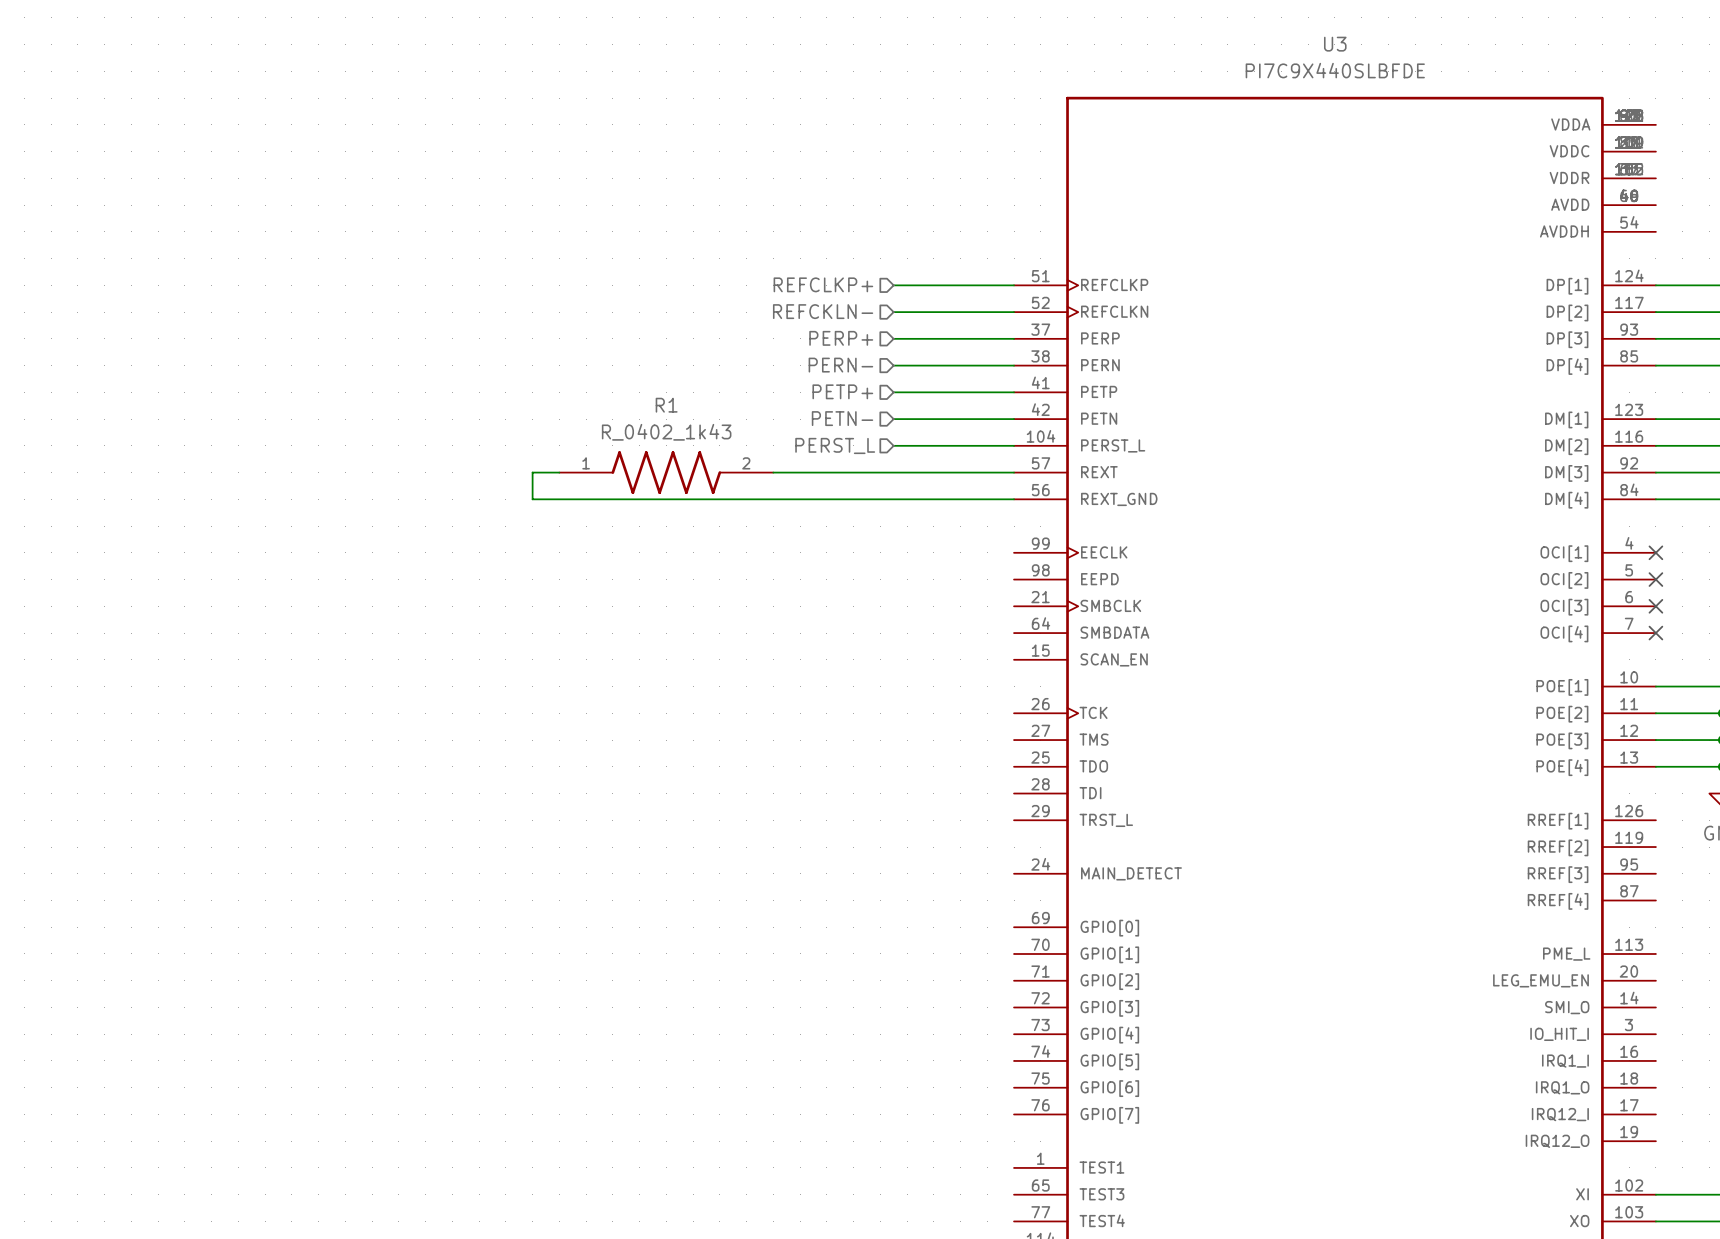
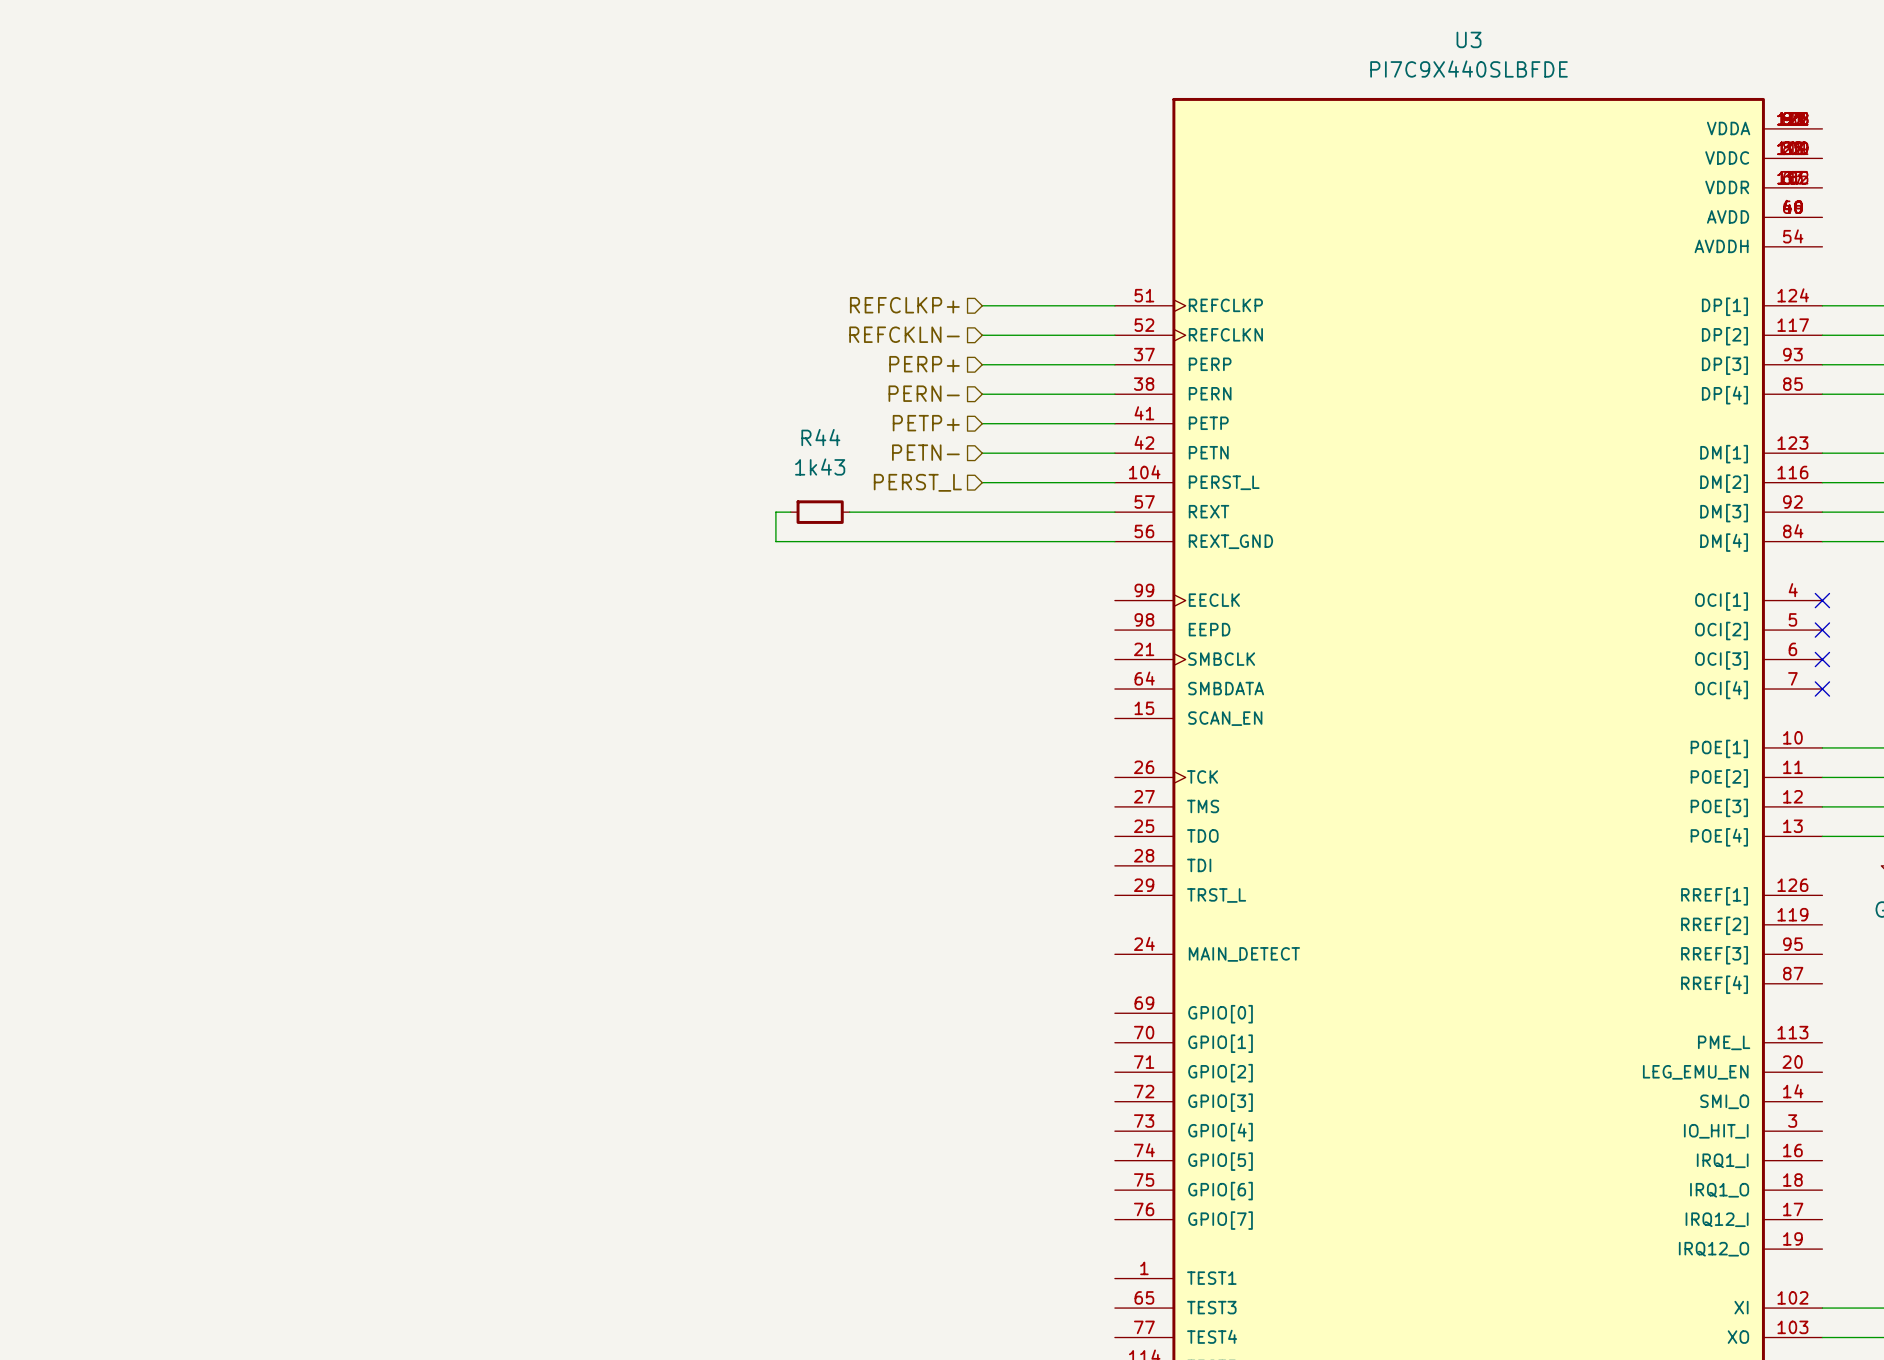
wire: (559, 472) (532, 472) (532, 499) (706, 499) -> (790, 512) (775, 512) (775, 541)
R1: R_0402_1k43 (666, 472) -> none
R44: none -> (820, 512)

